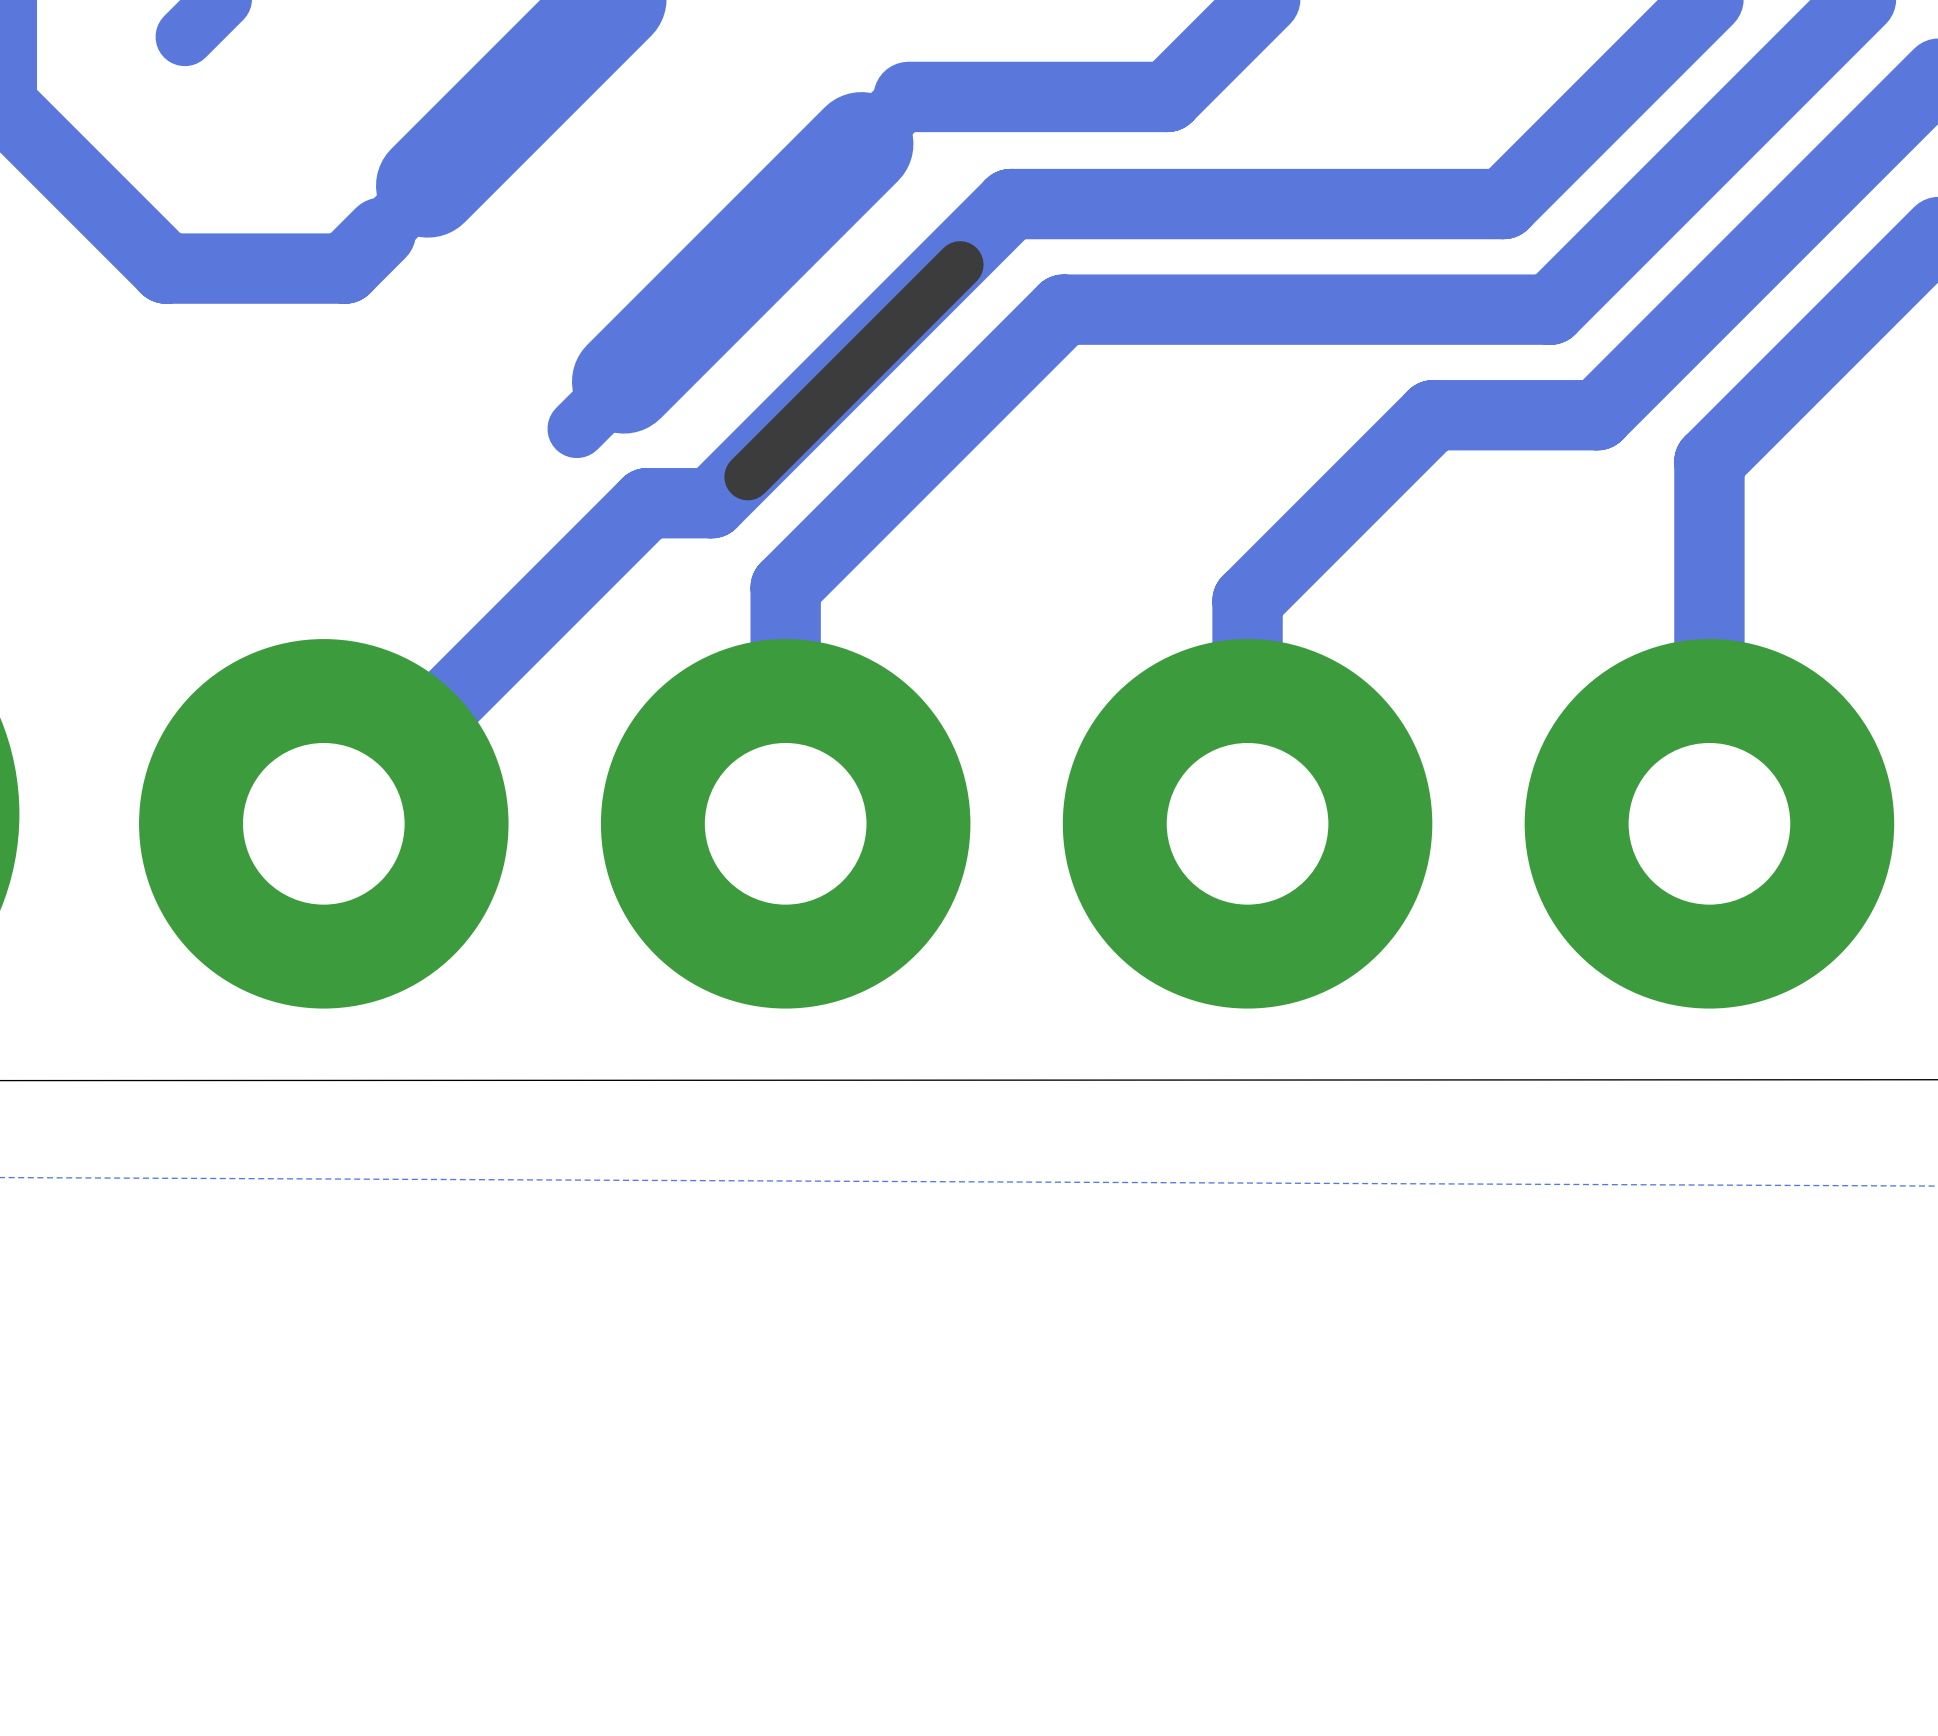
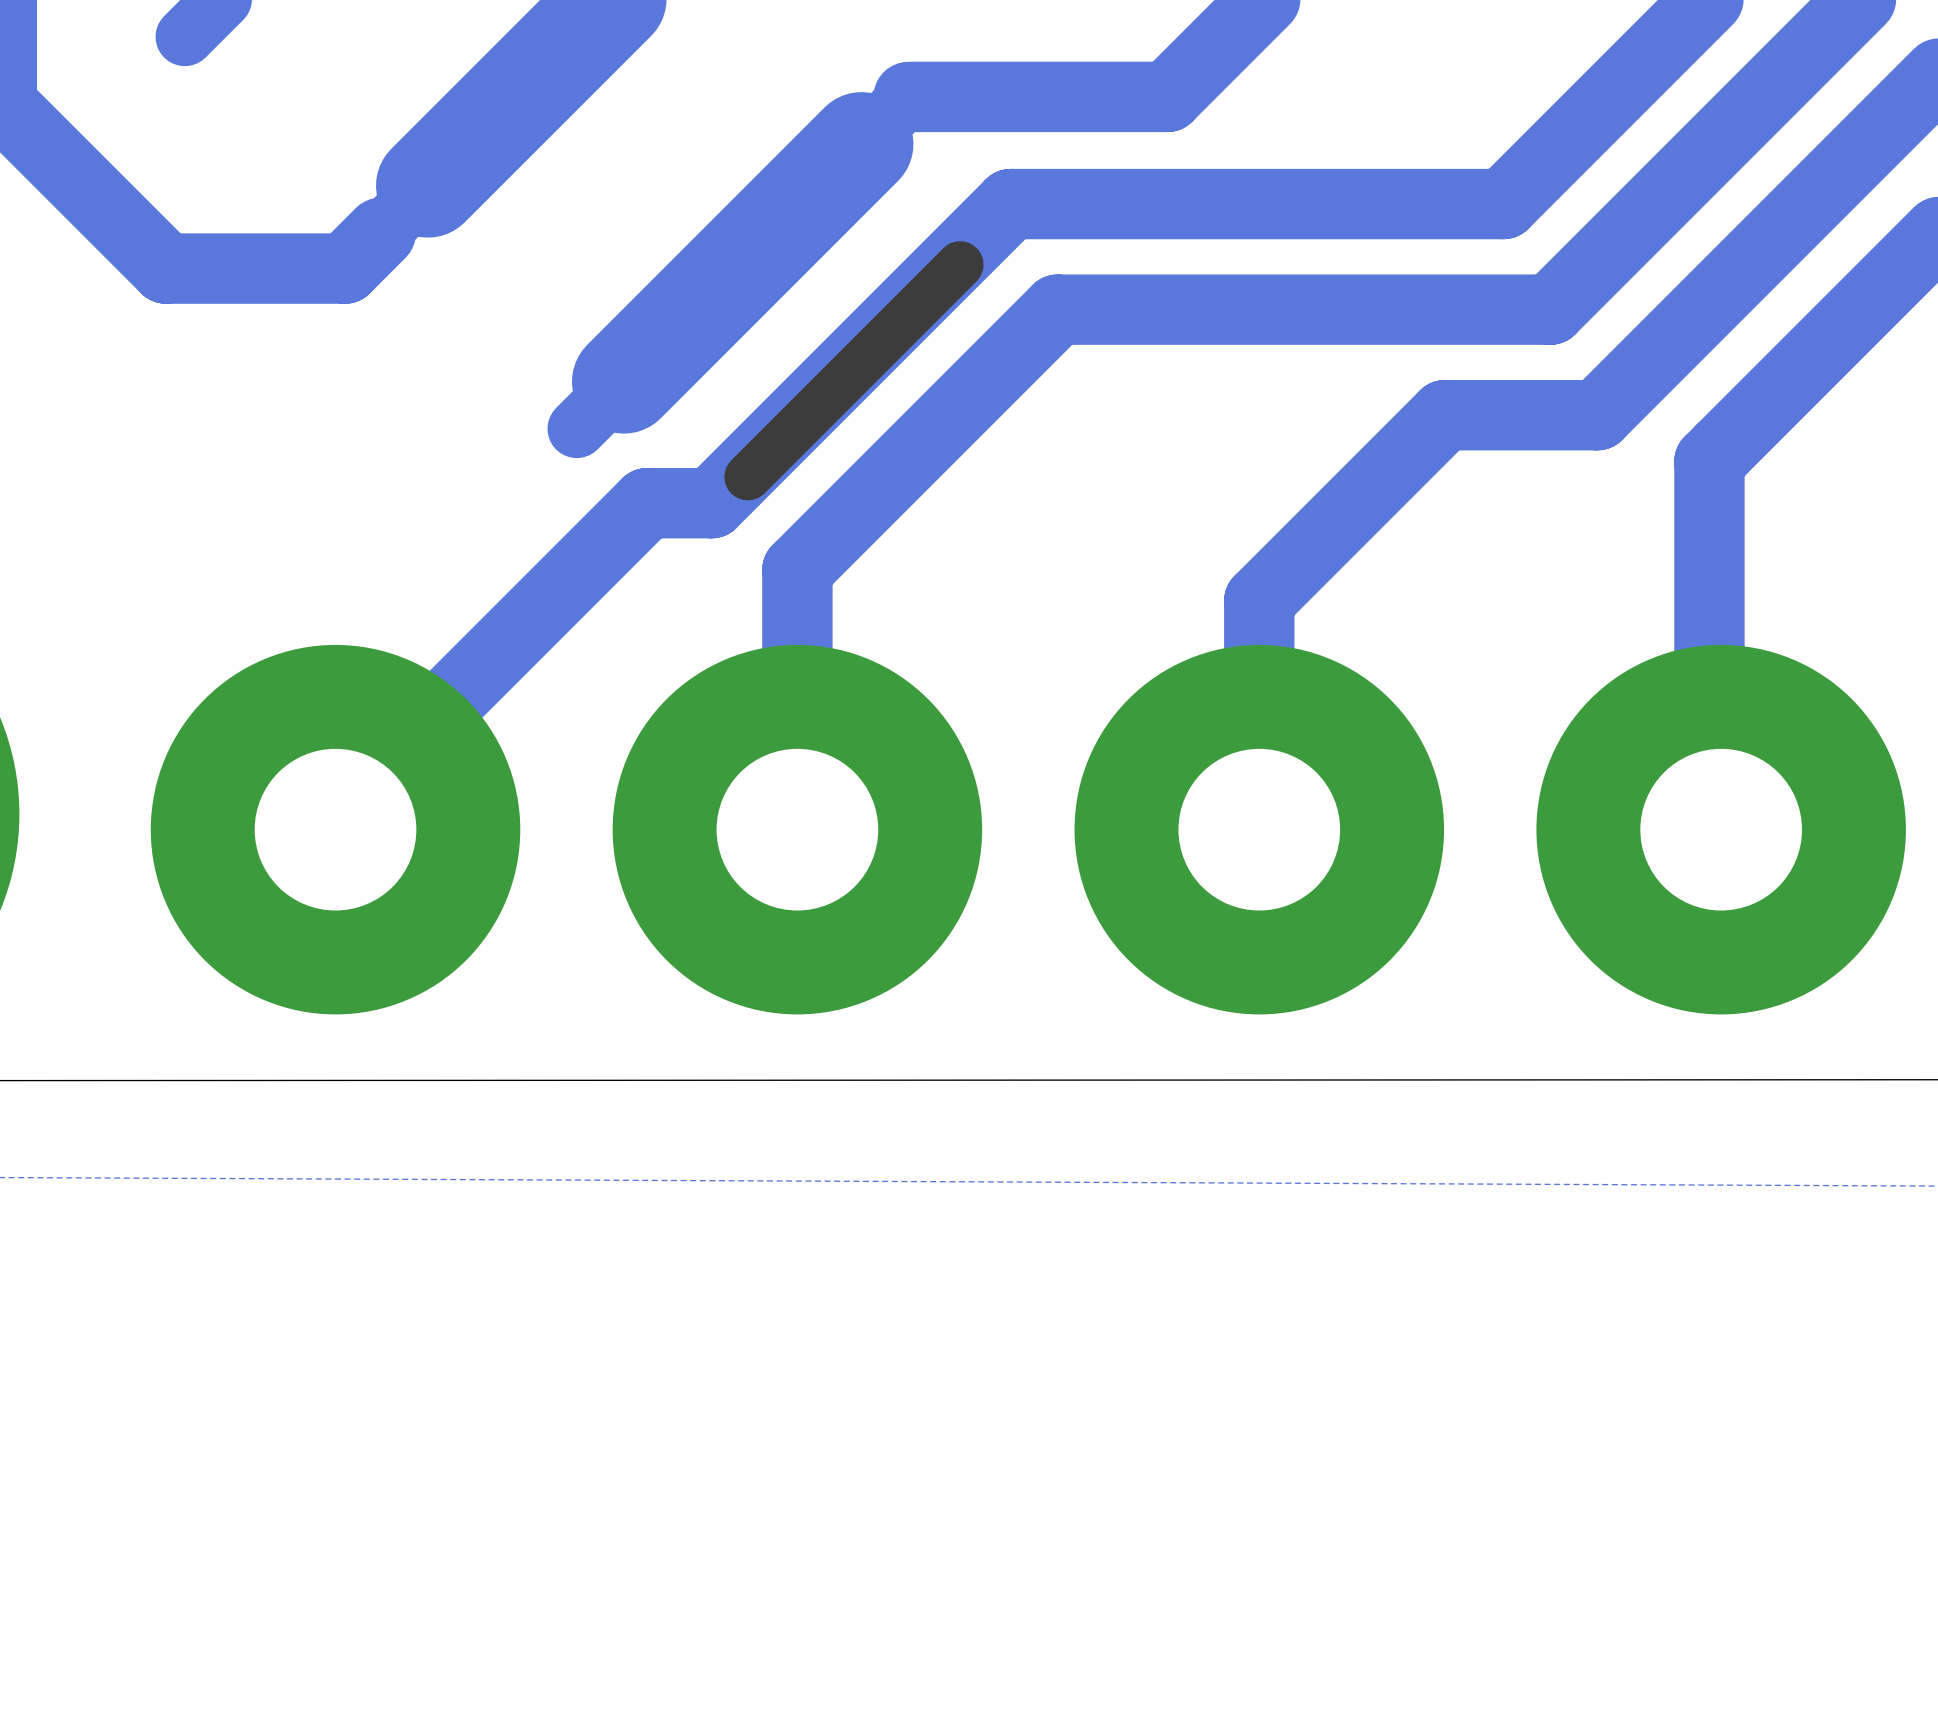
track: (1063, 309) (785, 587) (785, 823) -> (1063, 309) (1057, 309) (797, 569) (797, 829)
track: (1444, 415) (1433, 415) (1247, 600) (1247, 823) -> (1444, 415) (1259, 600) (1259, 829)
part position: (1016, 823) -> (1028, 829)

